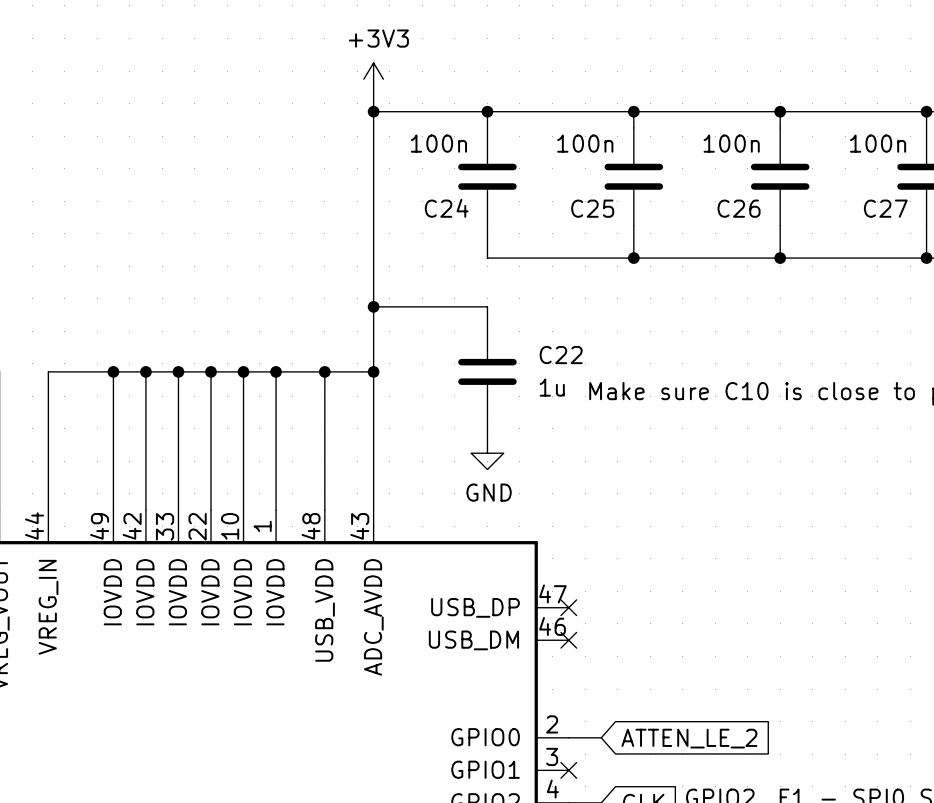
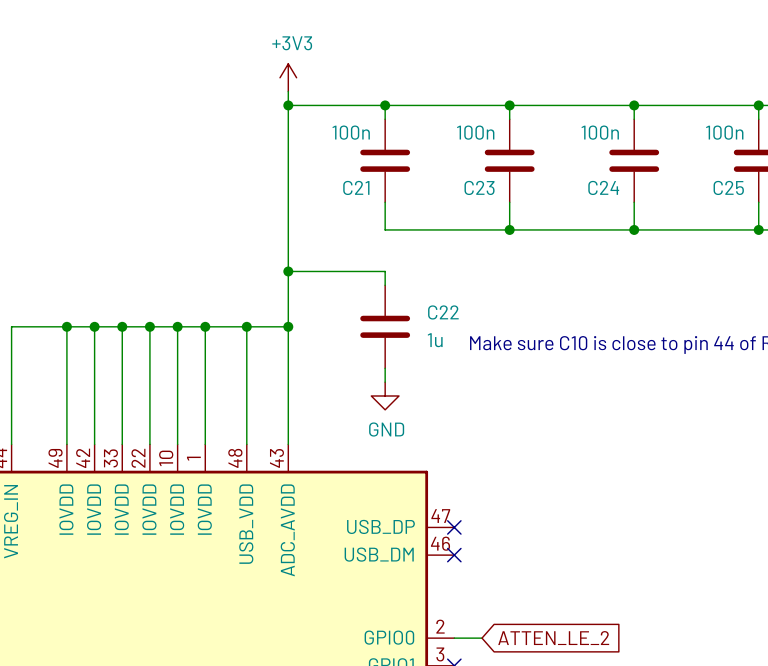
C24 name: C24 (446, 208) -> C21 (356, 187)
C25 name: C25 (592, 208) -> C23 (479, 187)
C26 name: C26 (739, 208) -> C24 (603, 187)
C27 name: C27 (885, 208) -> C25 (728, 187)

